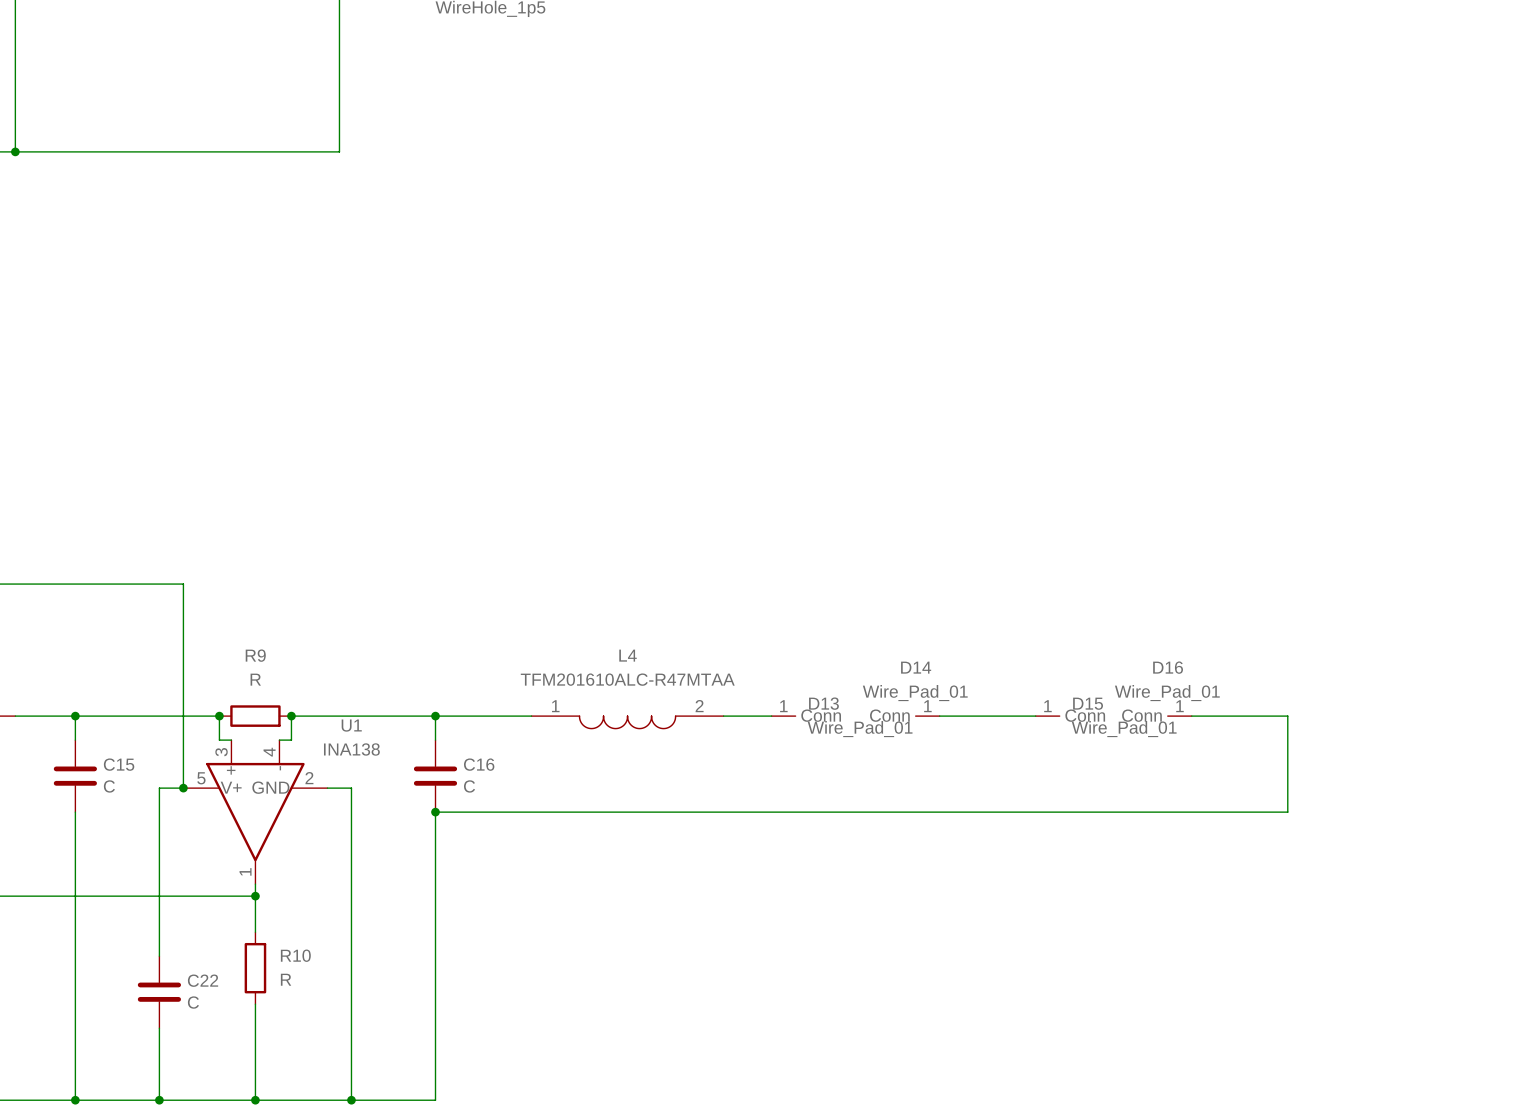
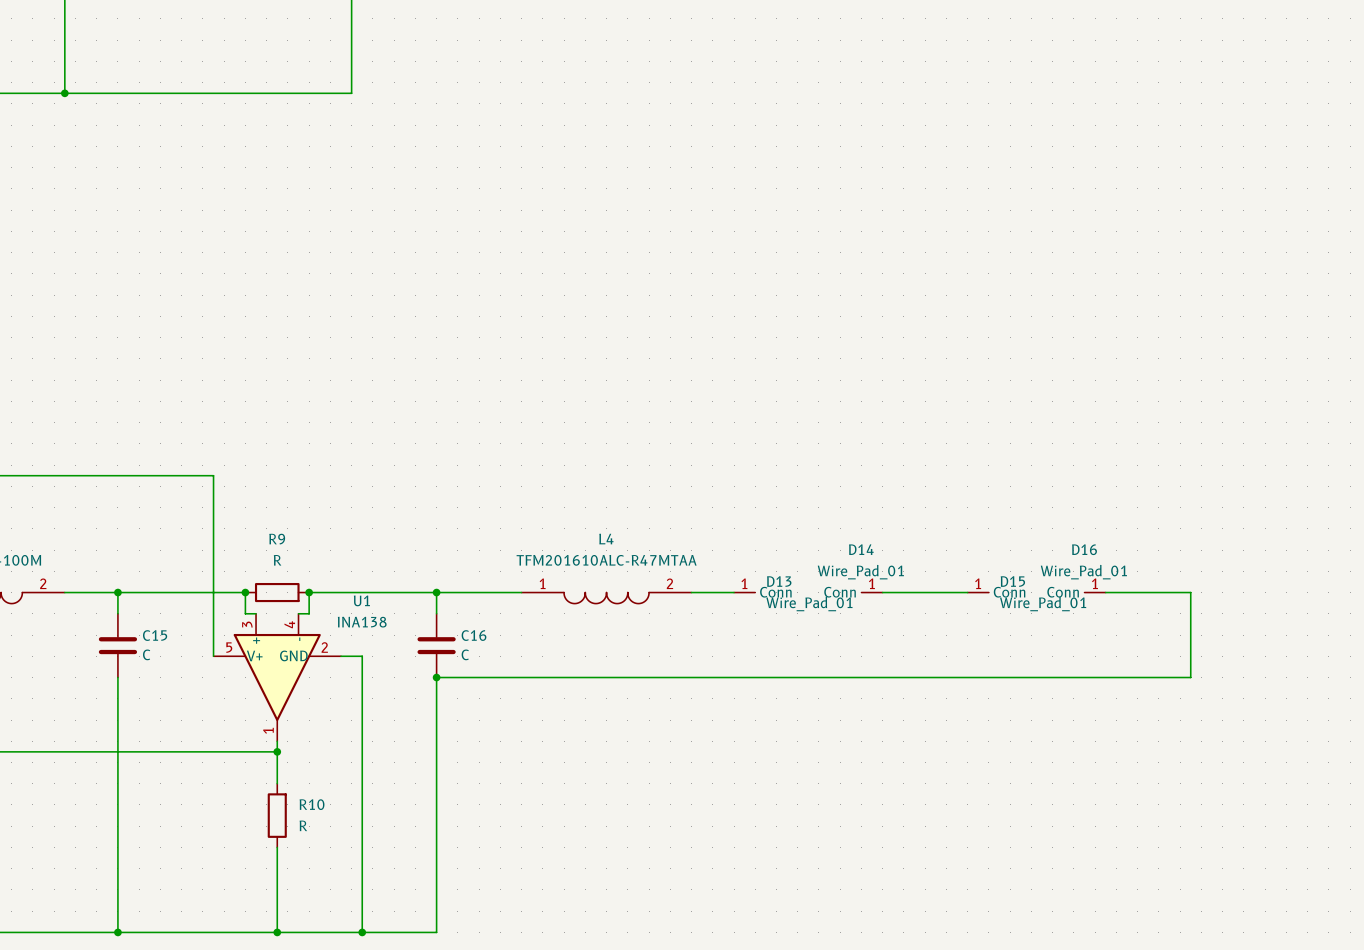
wire: (183, 788) (159, 788) (159, 956) -> none
junction: (183, 788) -> none
C22: C (159, 992) -> none
wire: (159, 1028) (159, 1100) -> none
junction: (159, 1100) -> none

